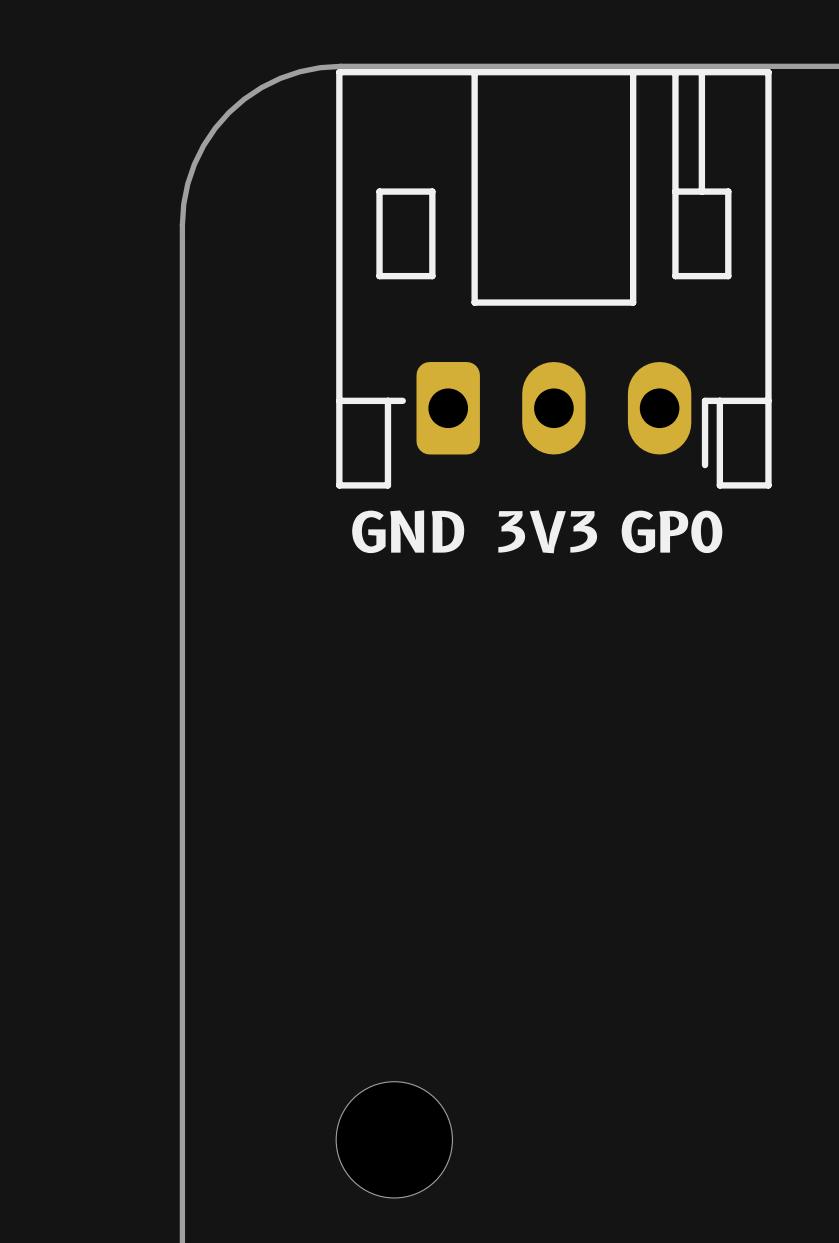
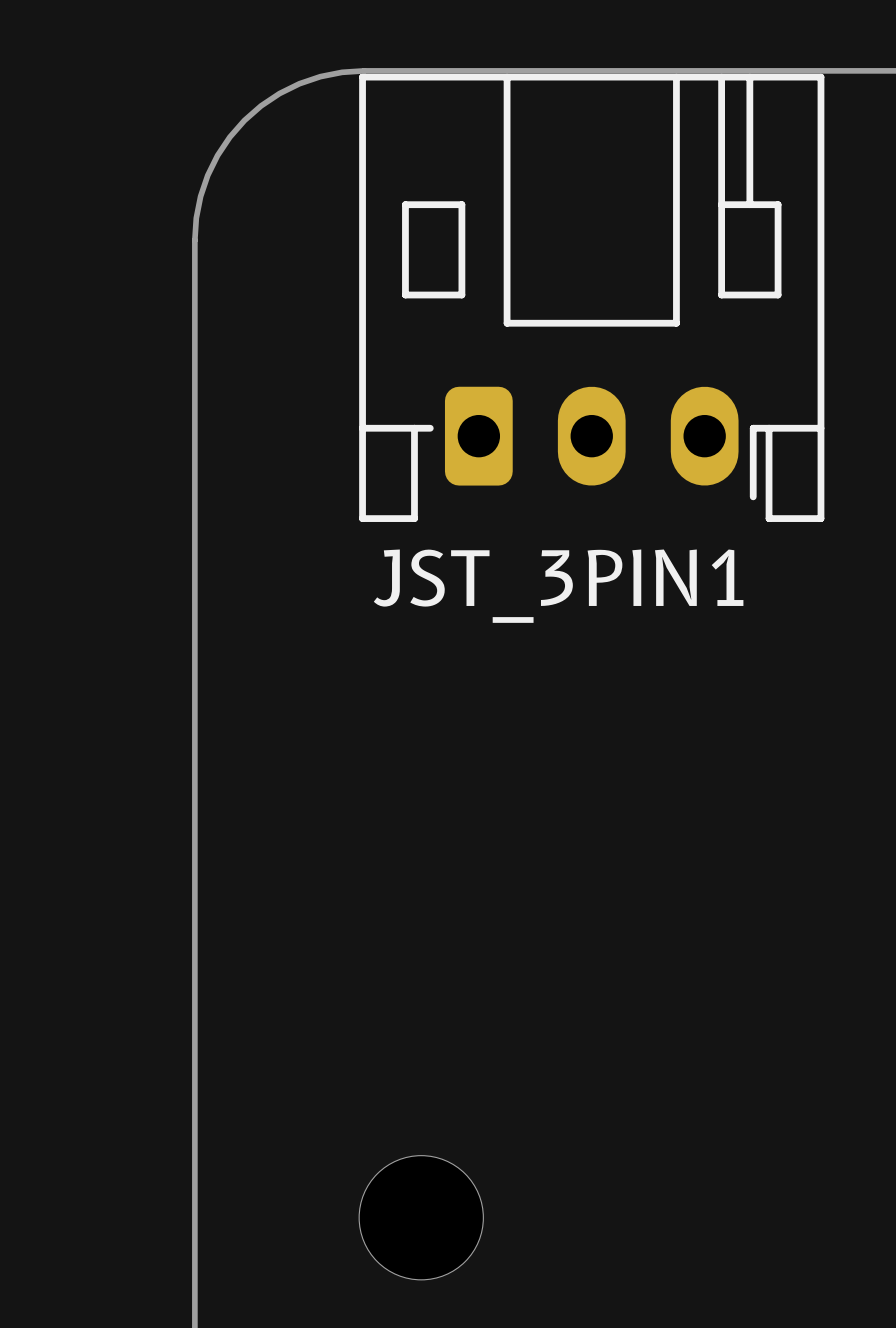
text: GND (408, 531) -> JST_3PIN1 (558, 586)
text: 3V3 (547, 531) -> none
text: GP0 (671, 531) -> none

